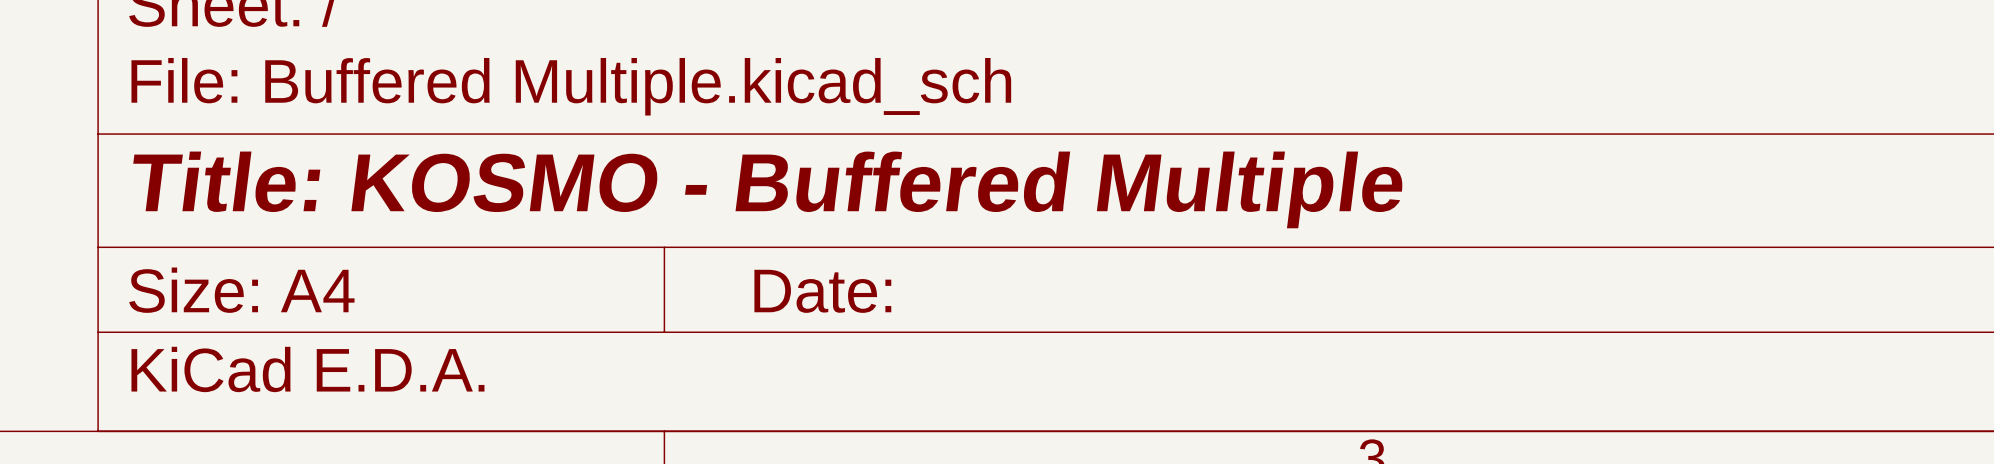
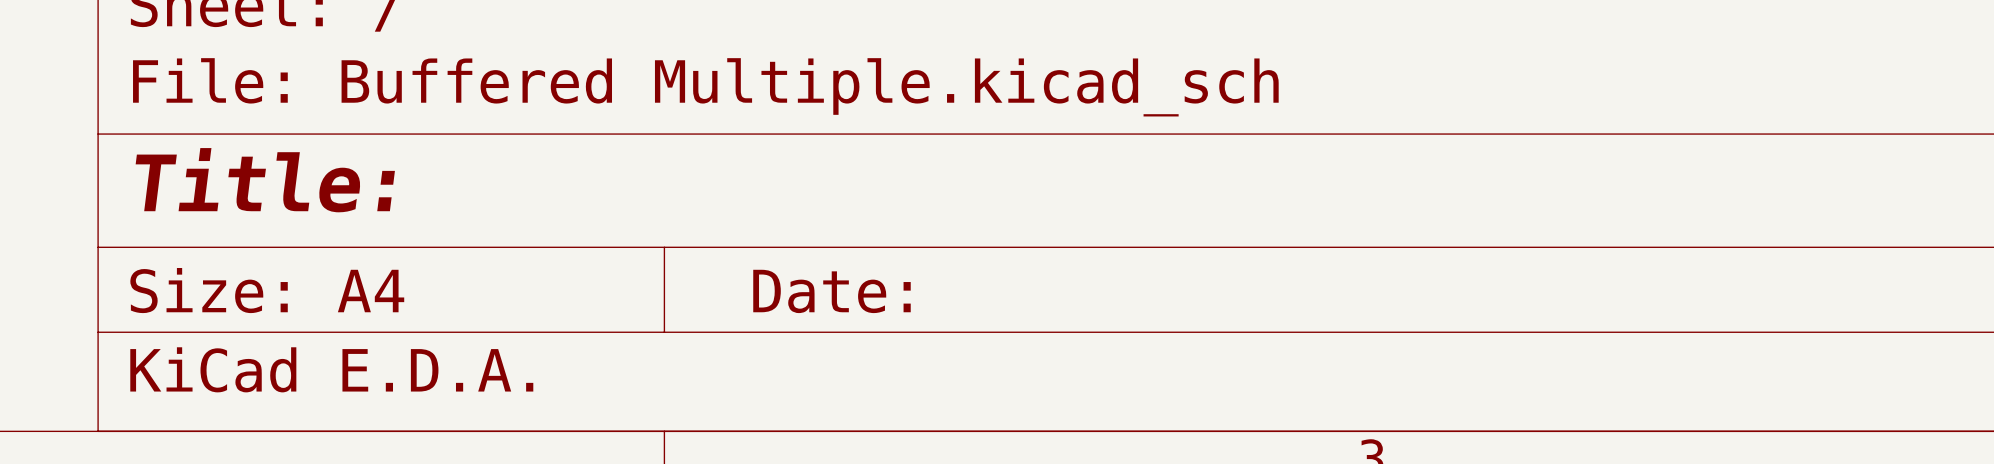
title block: Title: KOSMO - Buffered Multiple (768, 189) -> Title: (265, 180)

